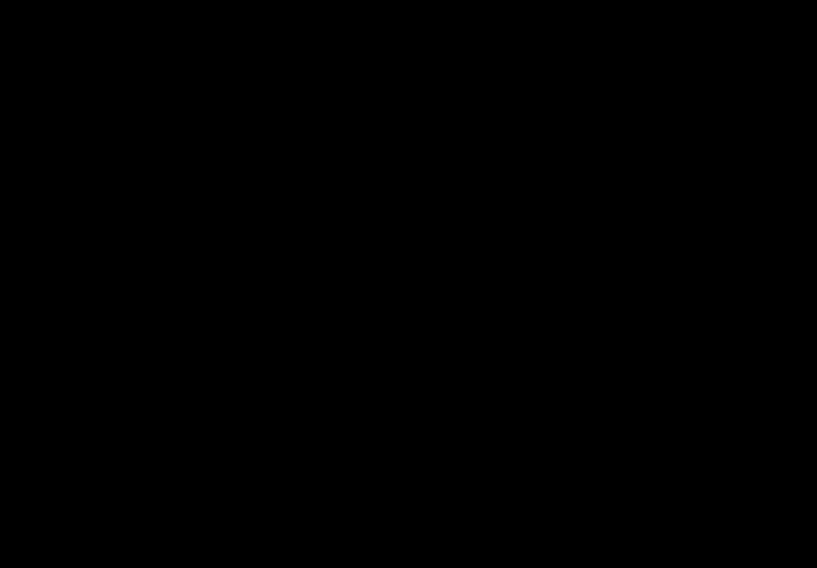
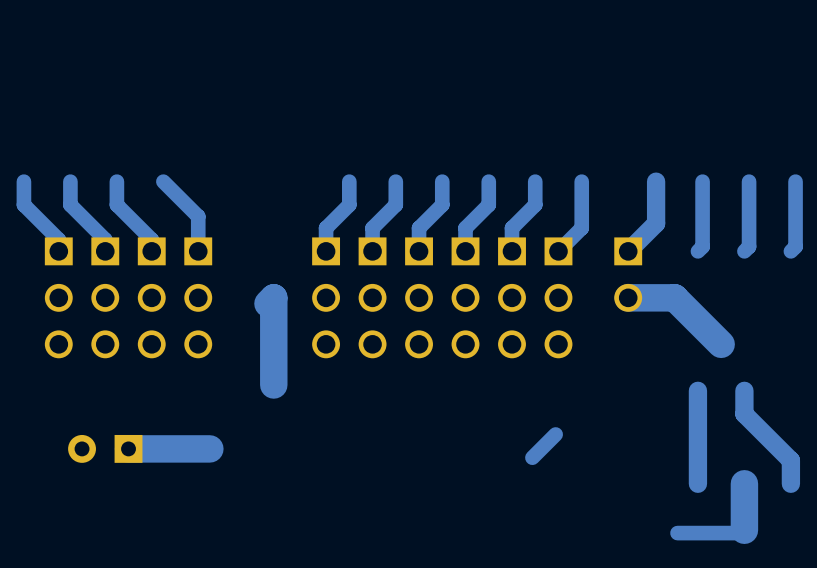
track: none -> (23, 181) (23, 204) (58, 239) (58, 251)
track: none -> (70, 181) (70, 204) (105, 239) (105, 251)
track: none -> (116, 181) (116, 204) (151, 239) (151, 251)
track: none -> (163, 181) (198, 216) (198, 251)
track: none -> (349, 181) (349, 204) (326, 228) (326, 251)
track: none -> (395, 181) (395, 204) (372, 228) (372, 251)
track: none -> (442, 181) (442, 204) (419, 228) (419, 251)
track: none -> (488, 181) (488, 204) (465, 228) (465, 251)
track: none -> (535, 181) (535, 204) (512, 228) (512, 251)
track: none -> (581, 181) (581, 228) (558, 251)
track: none -> (656, 181) (656, 223) (628, 251)
track: none -> (702, 181) (702, 246) (697, 251)
track: none -> (749, 181) (749, 246) (744, 251)
track: none -> (795, 181) (795, 246) (790, 251)
part: none -> (628, 274)
part: none -> (58, 297)
part: none -> (105, 297)
part: none -> (151, 297)
part: none -> (198, 297)
part: none -> (326, 297)
part: none -> (372, 297)
part: none -> (419, 297)
part: none -> (465, 297)
part: none -> (512, 297)
part: none -> (558, 297)
track: none -> (628, 297) (674, 297) (721, 344)
track: none -> (267, 303) (273, 297) (273, 385)
track: none -> (697, 390) (697, 483)
track: none -> (744, 390) (744, 414) (790, 460) (790, 483)
track: none -> (555, 434) (532, 457)
part: none -> (105, 448)
track: none -> (209, 448) (128, 448)
track: none -> (744, 483) (744, 530) (741, 533) (677, 533)

